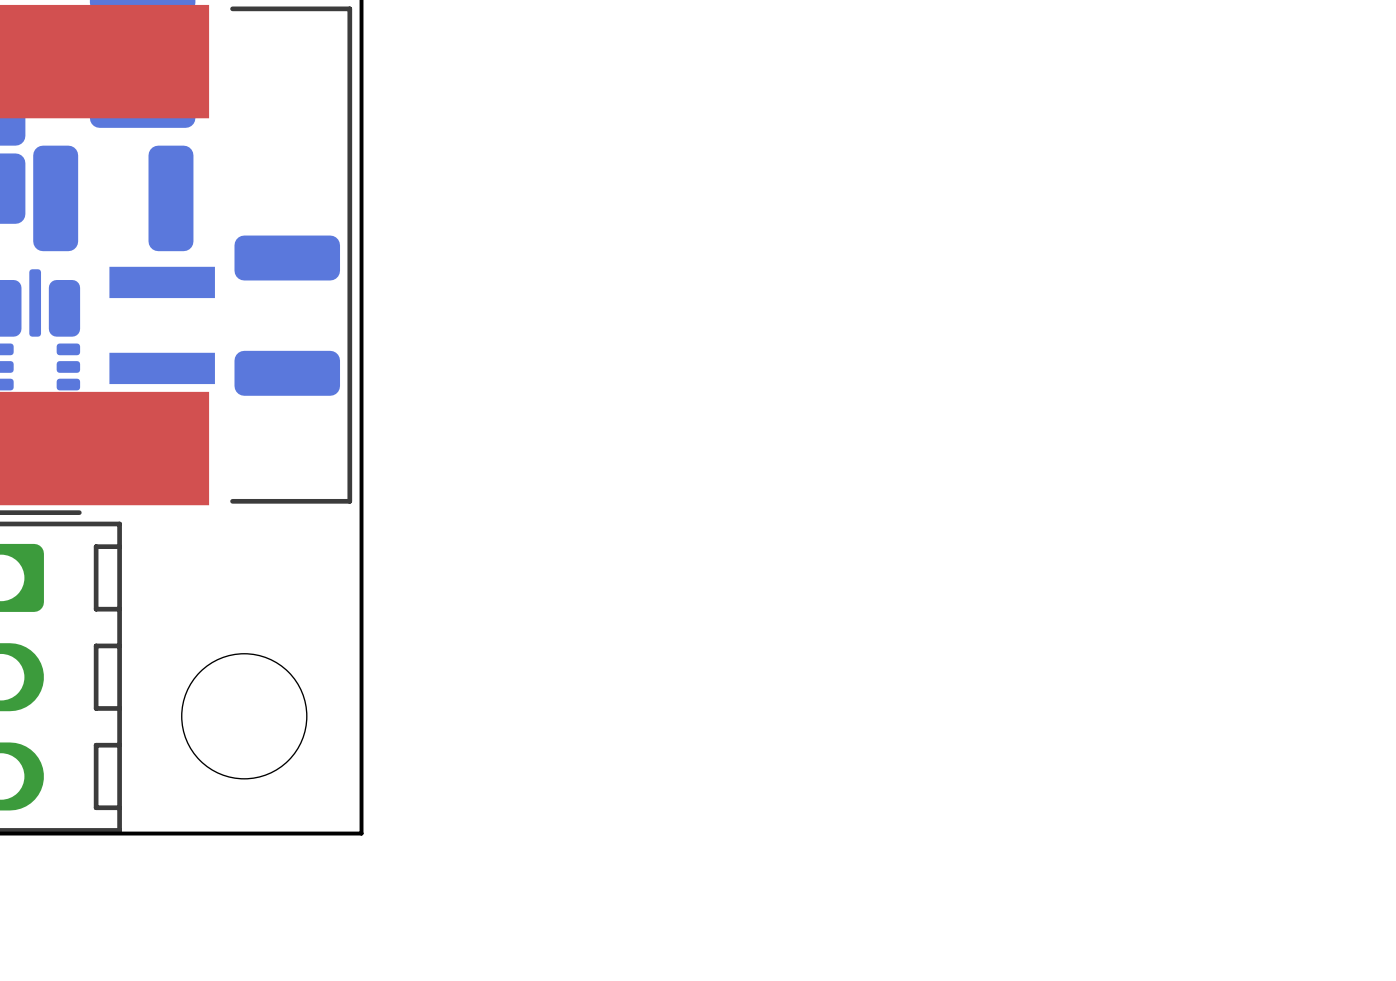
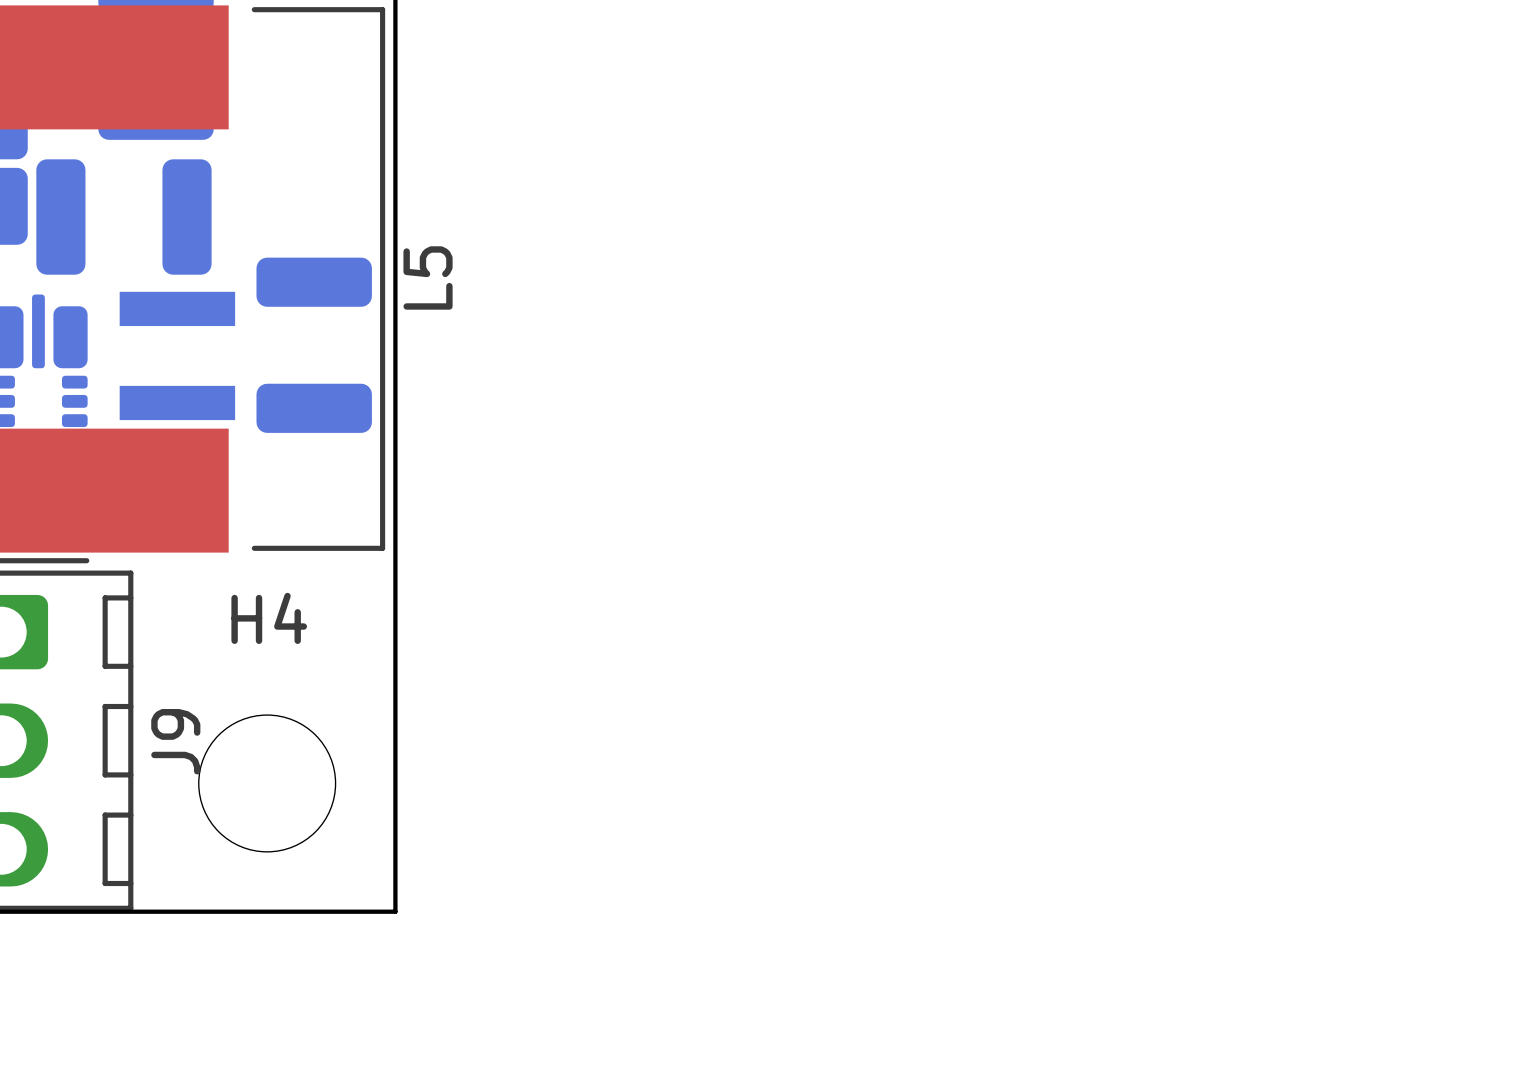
L5 name: none -> L5 (428, 277)
H4 name: none -> H4 (269, 618)
J9 name: none -> J9 (175, 741)

